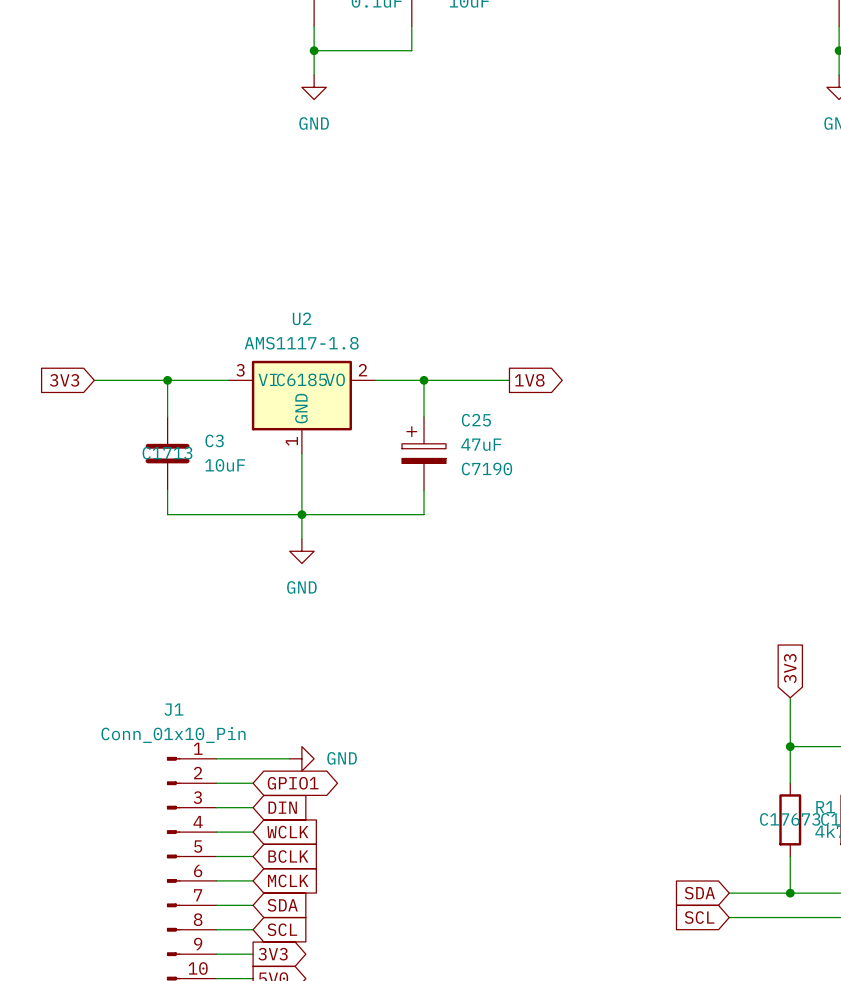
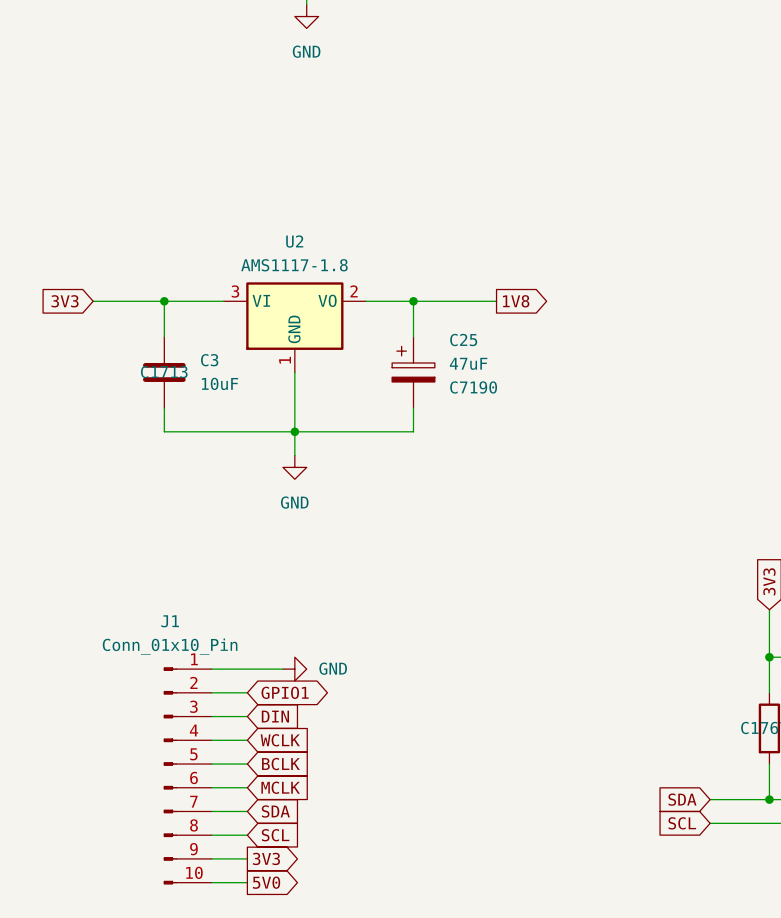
U2 text: C6185 (301, 379) -> none

